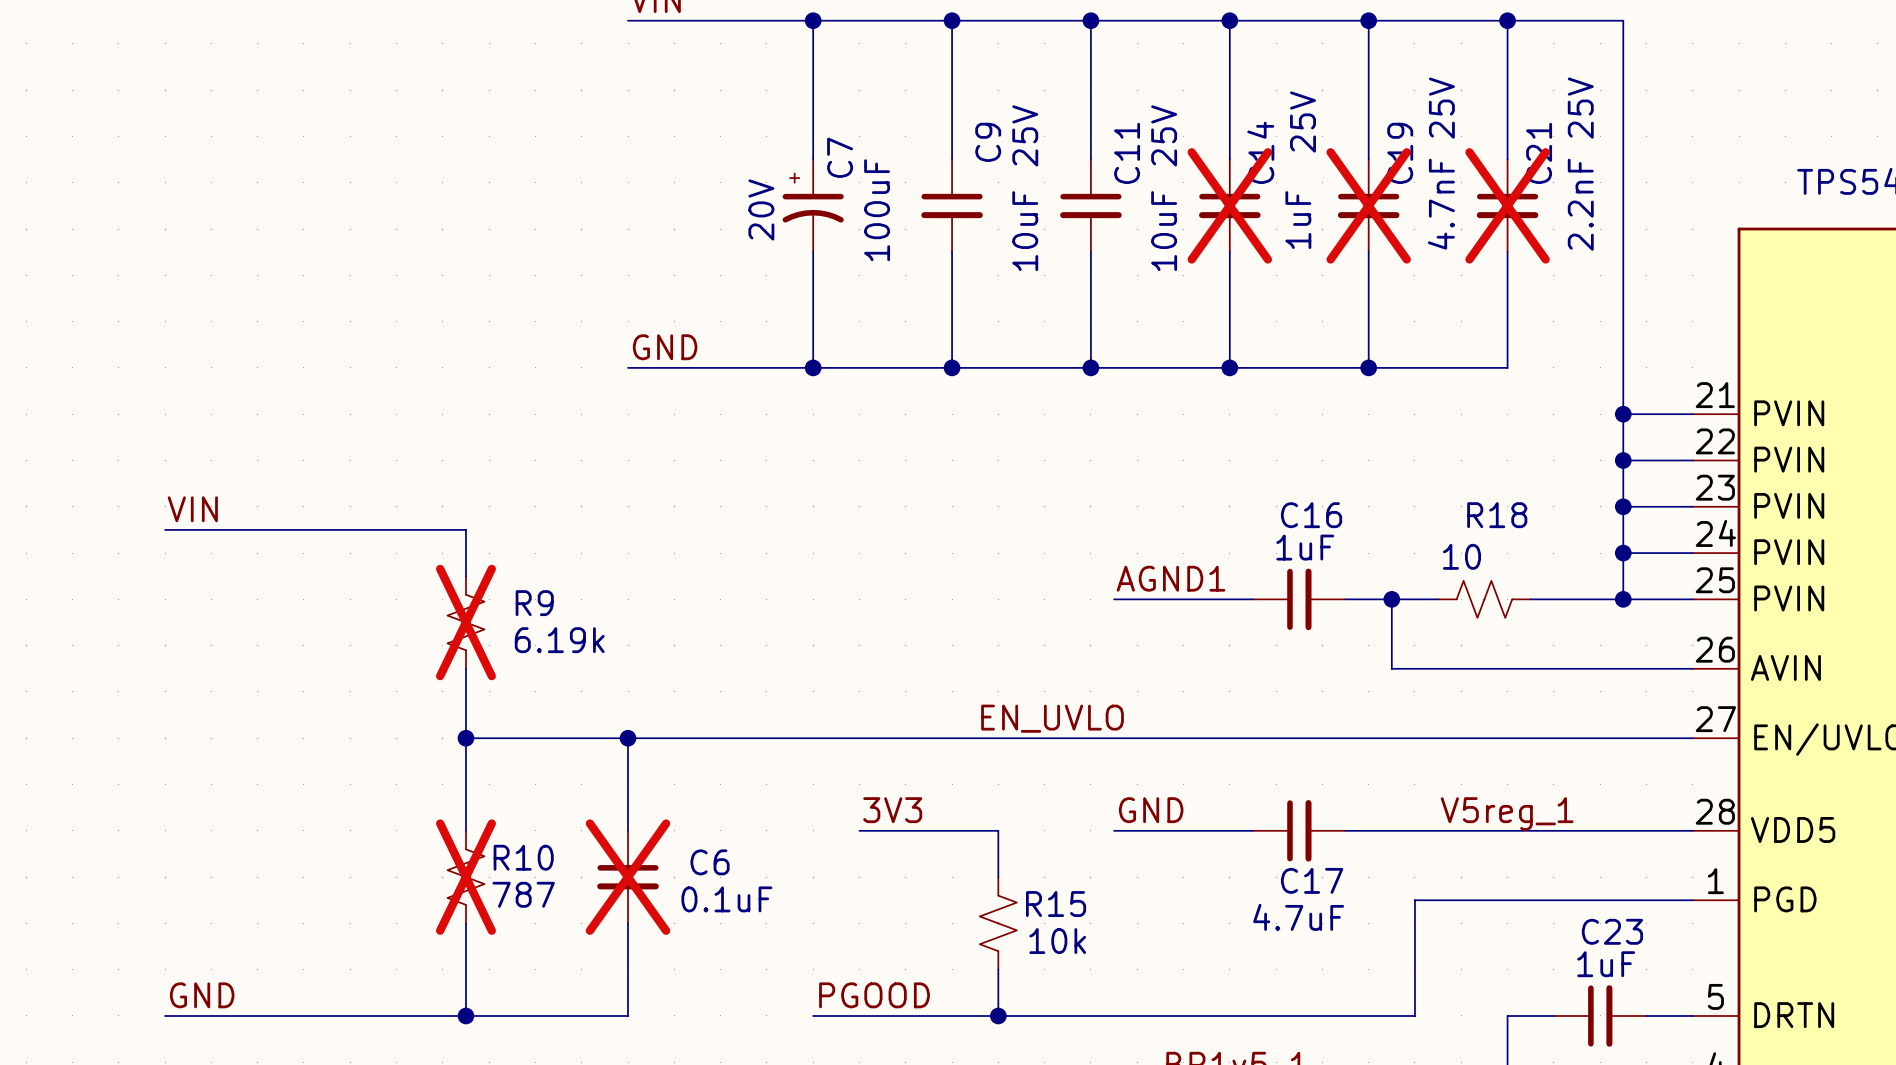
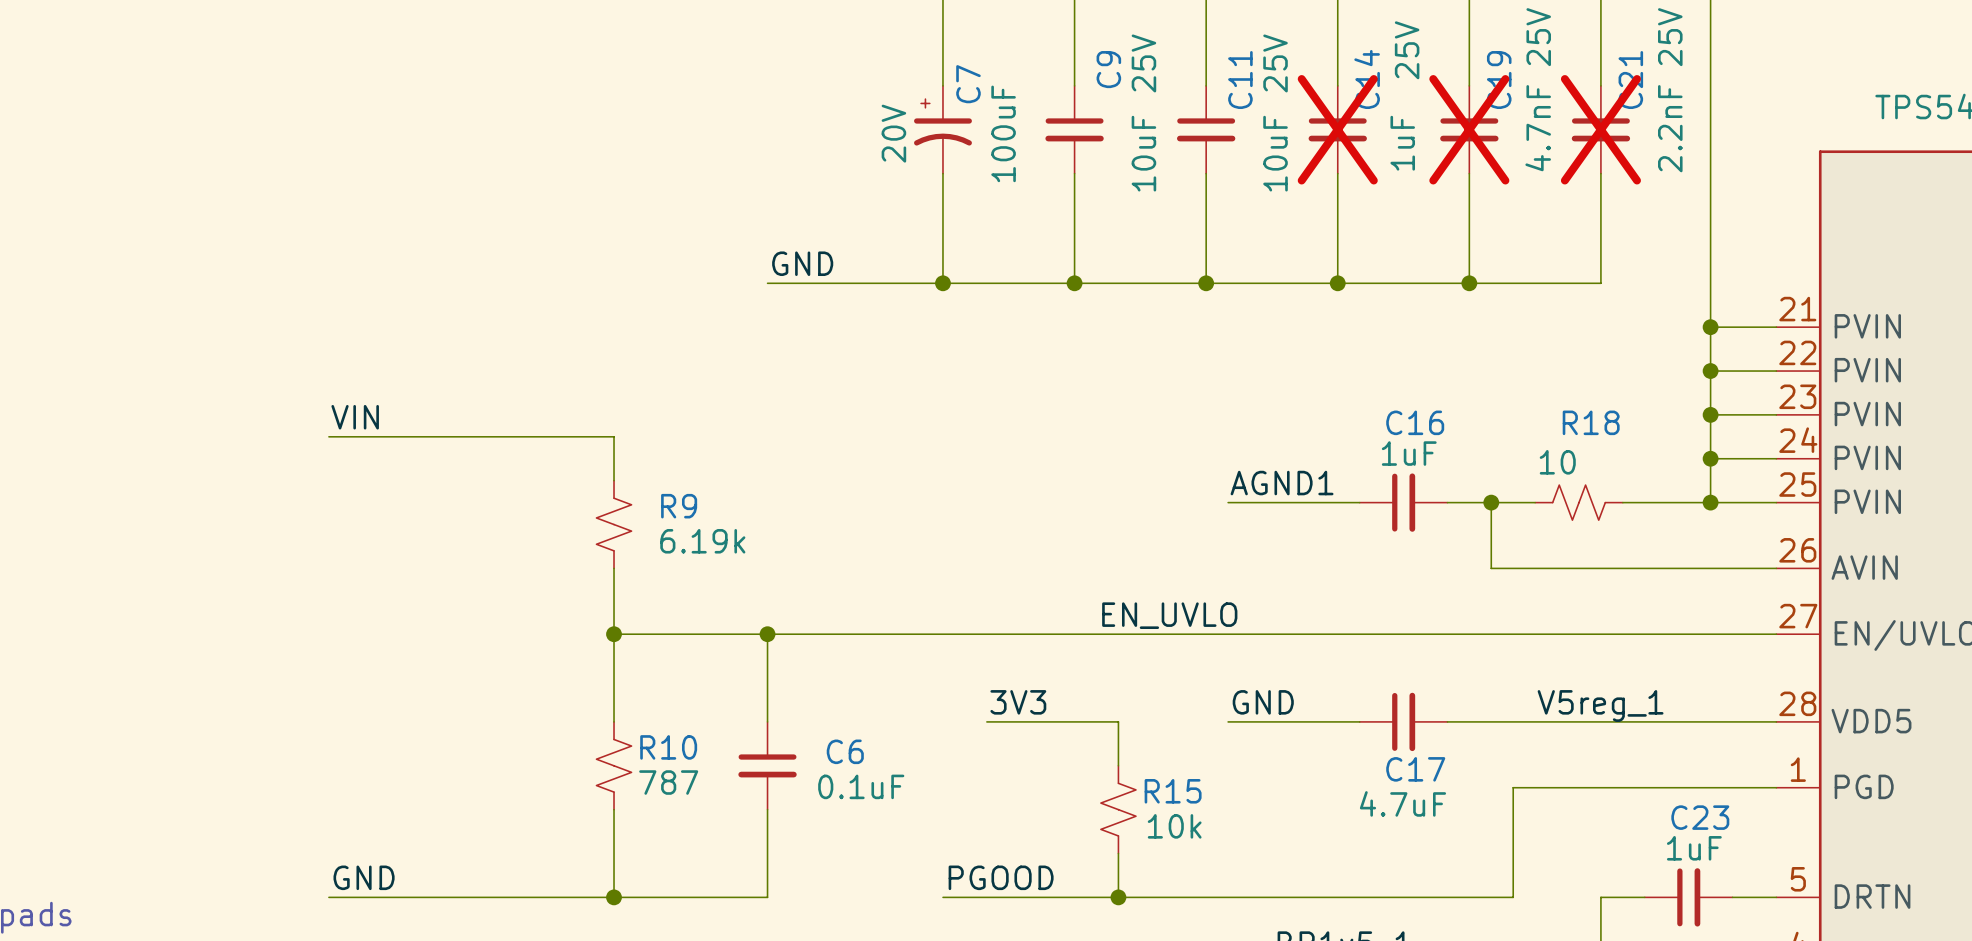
R9 do-not-place cross: (465, 622) -> none
R10 do-not-place cross: (465, 877) -> none
C6 do-not-place cross: (628, 877) -> none

